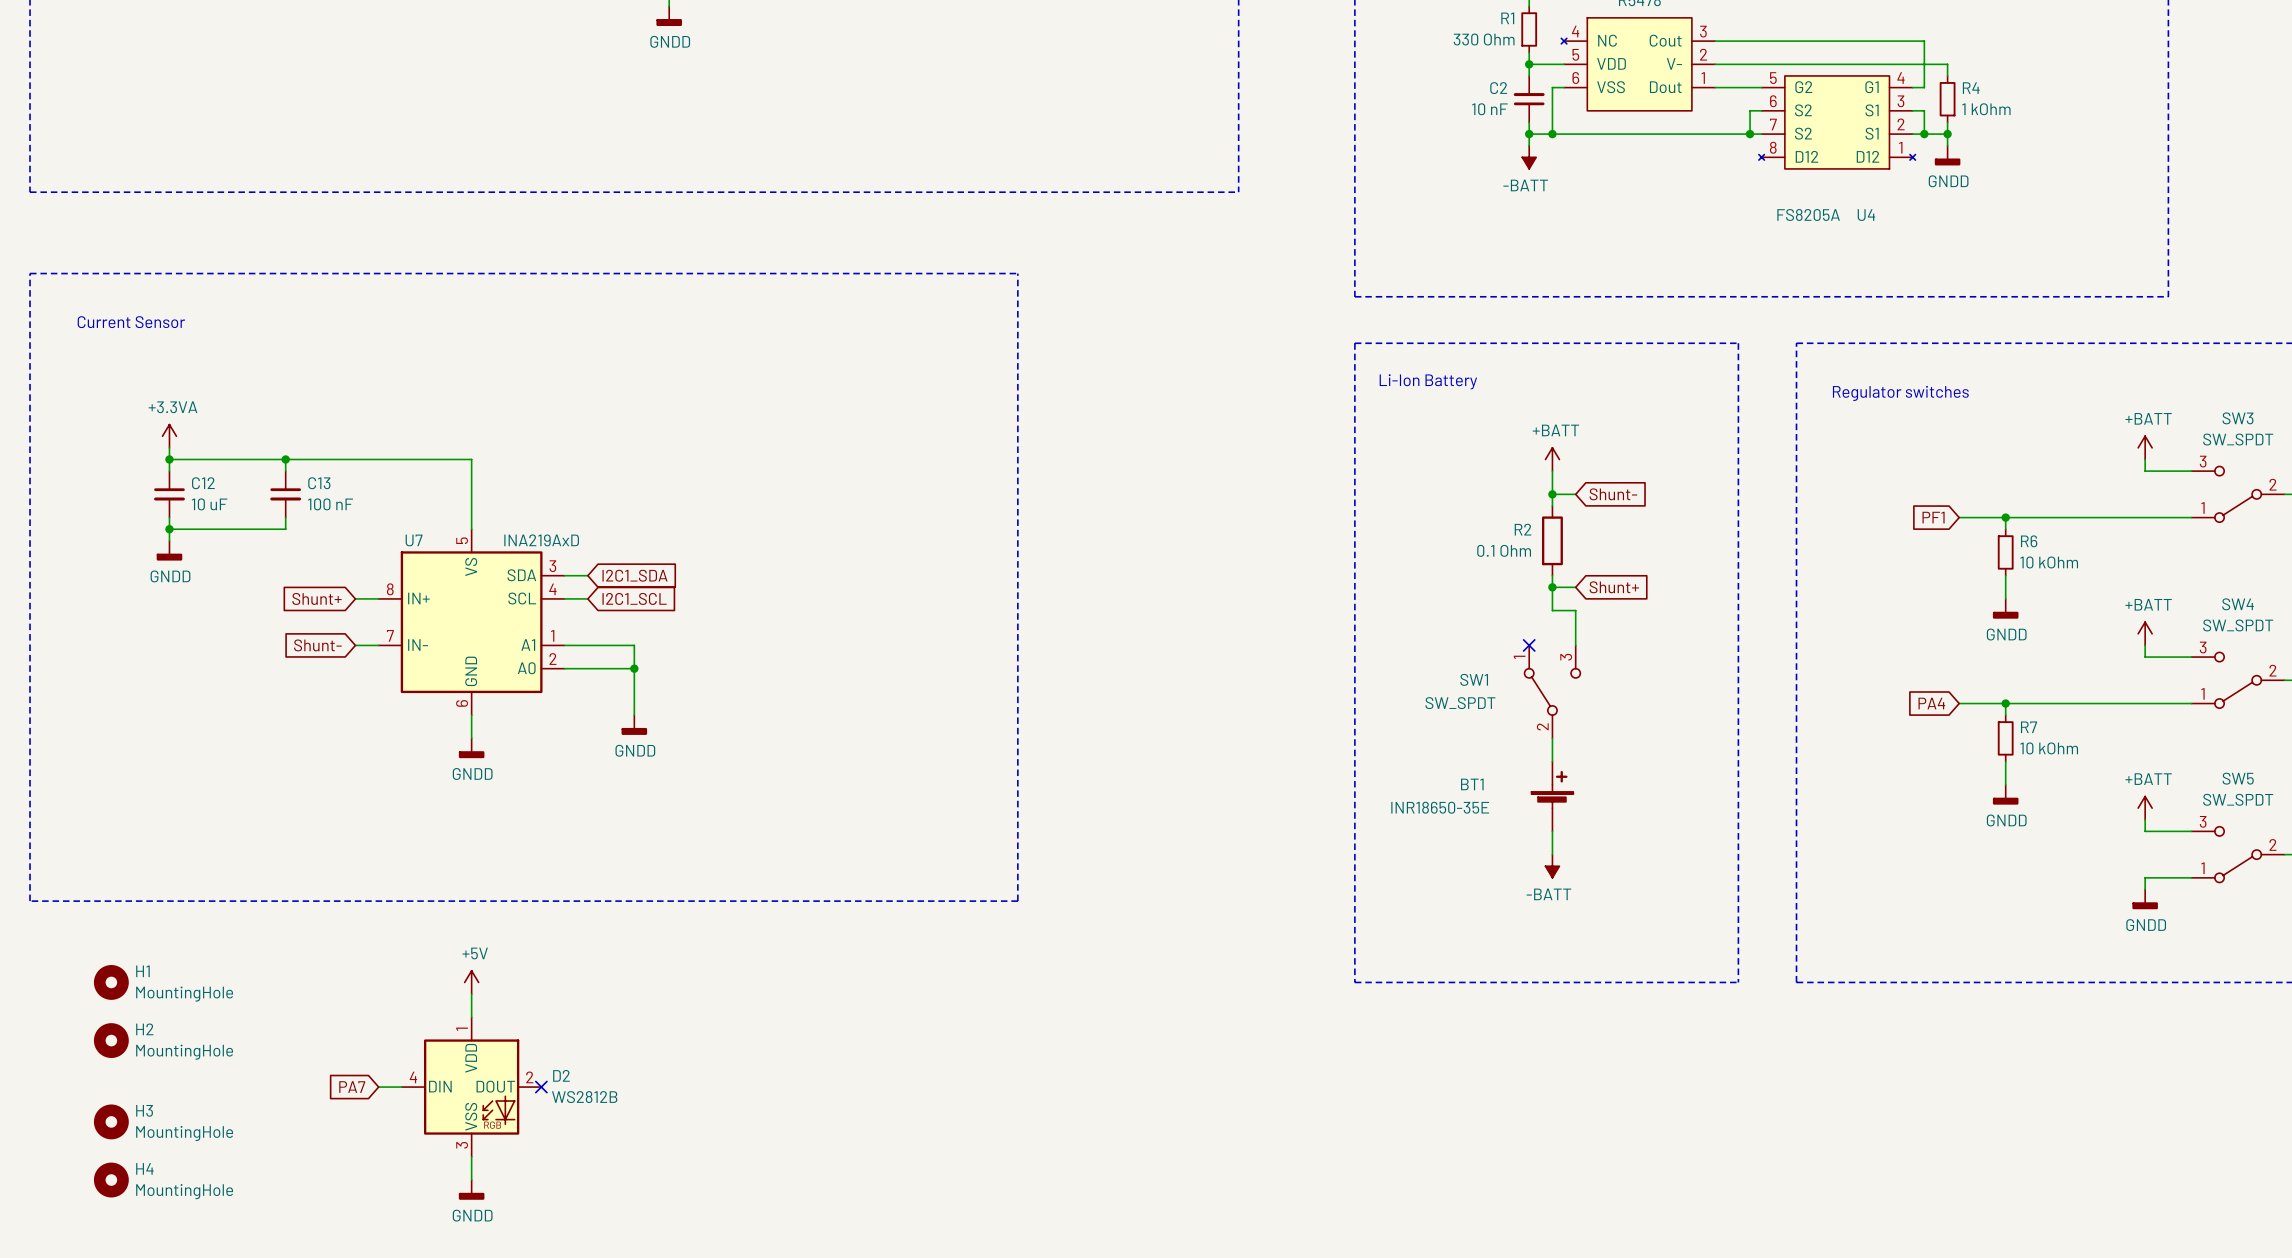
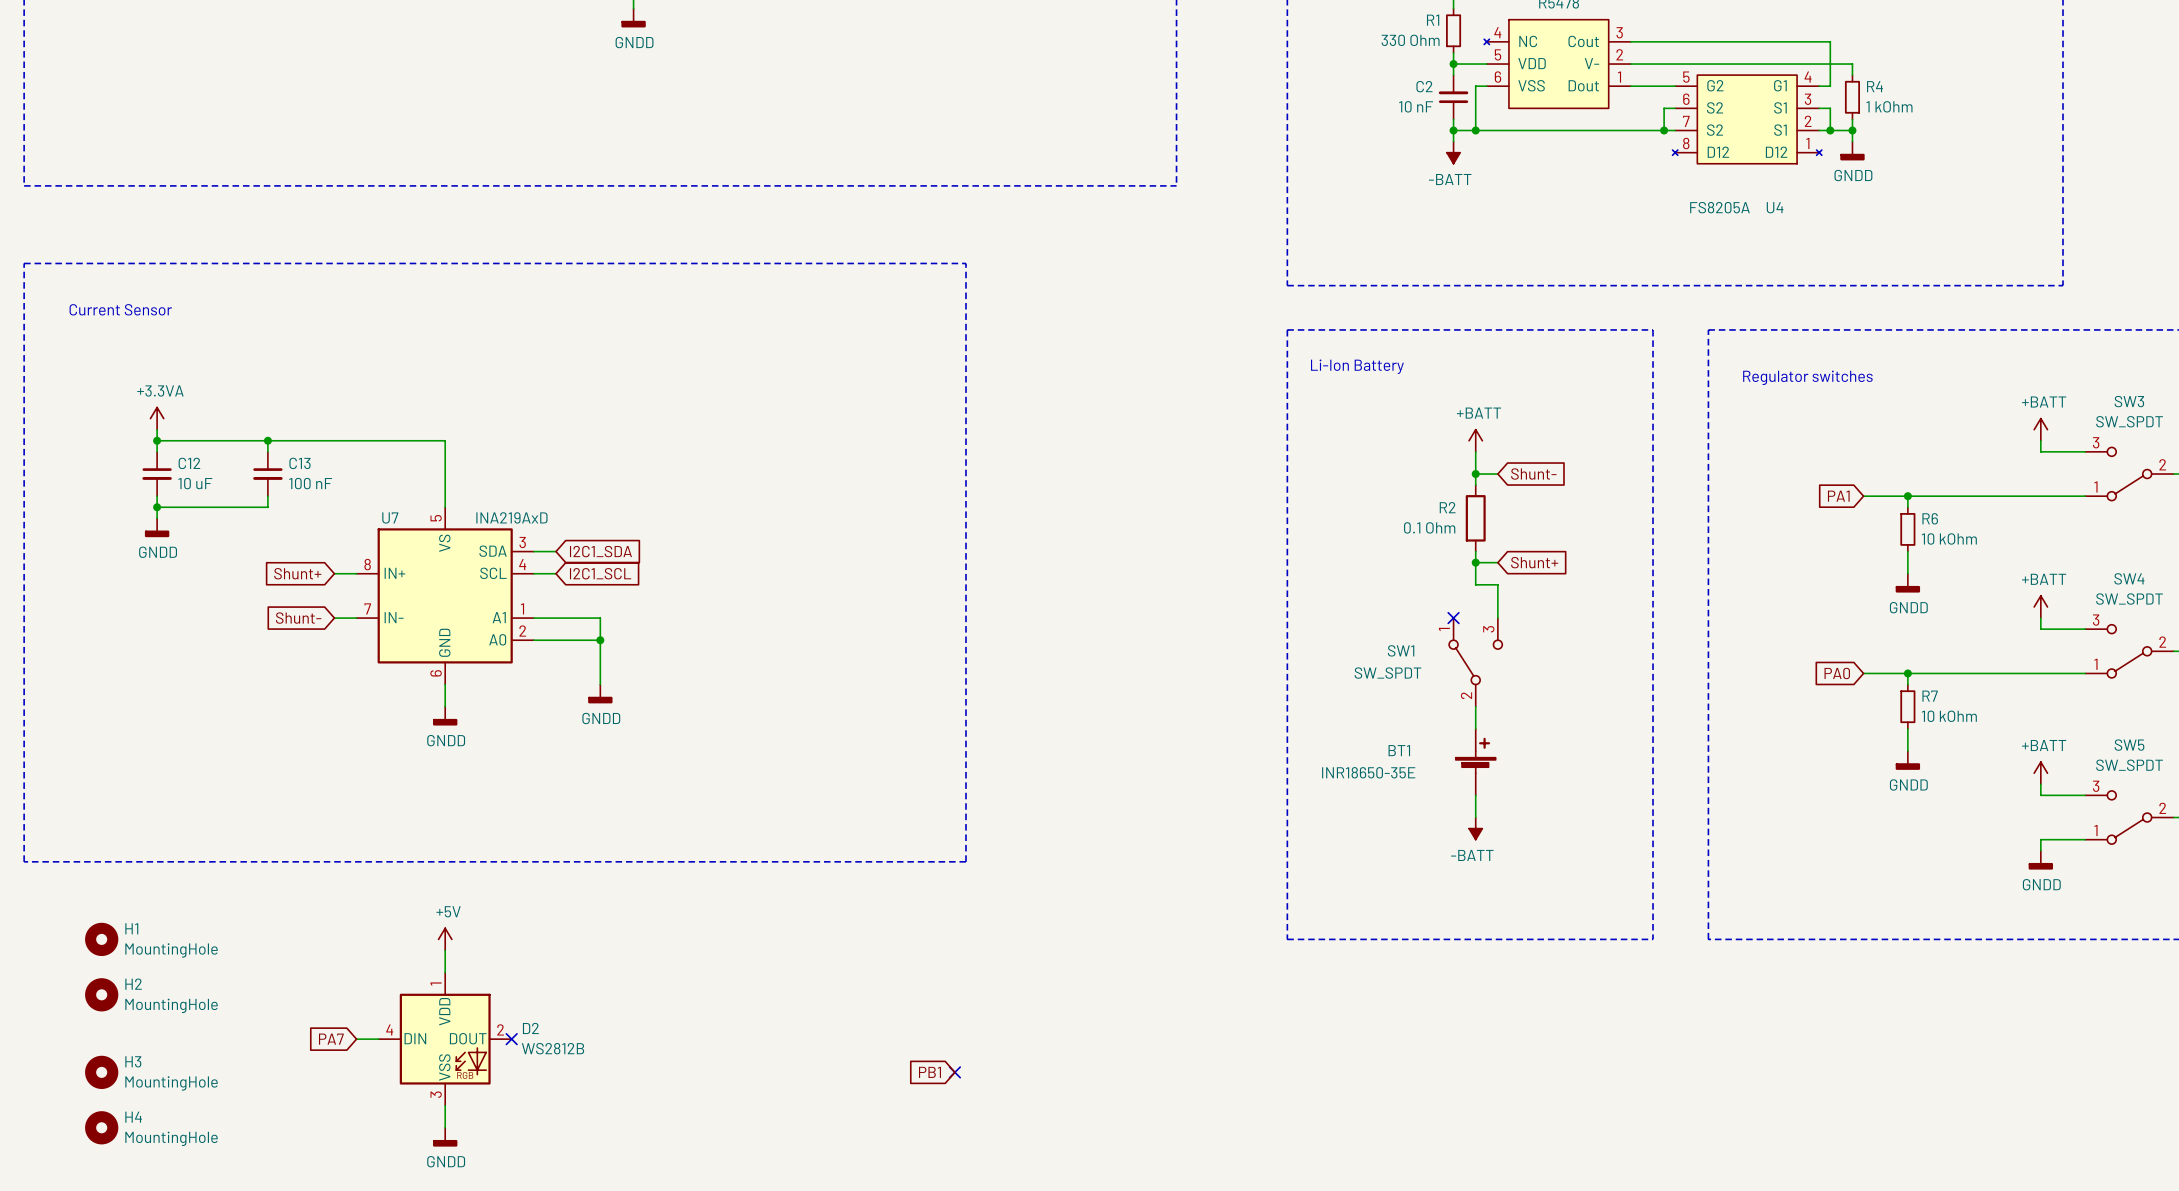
global label: PF1 (1933, 517) -> PA1 (1838, 496)
global label: PA4 (1931, 703) -> PA0 (1837, 673)
global label: none -> PB1 (929, 1072)
no-connect mark: none -> (954, 1072)

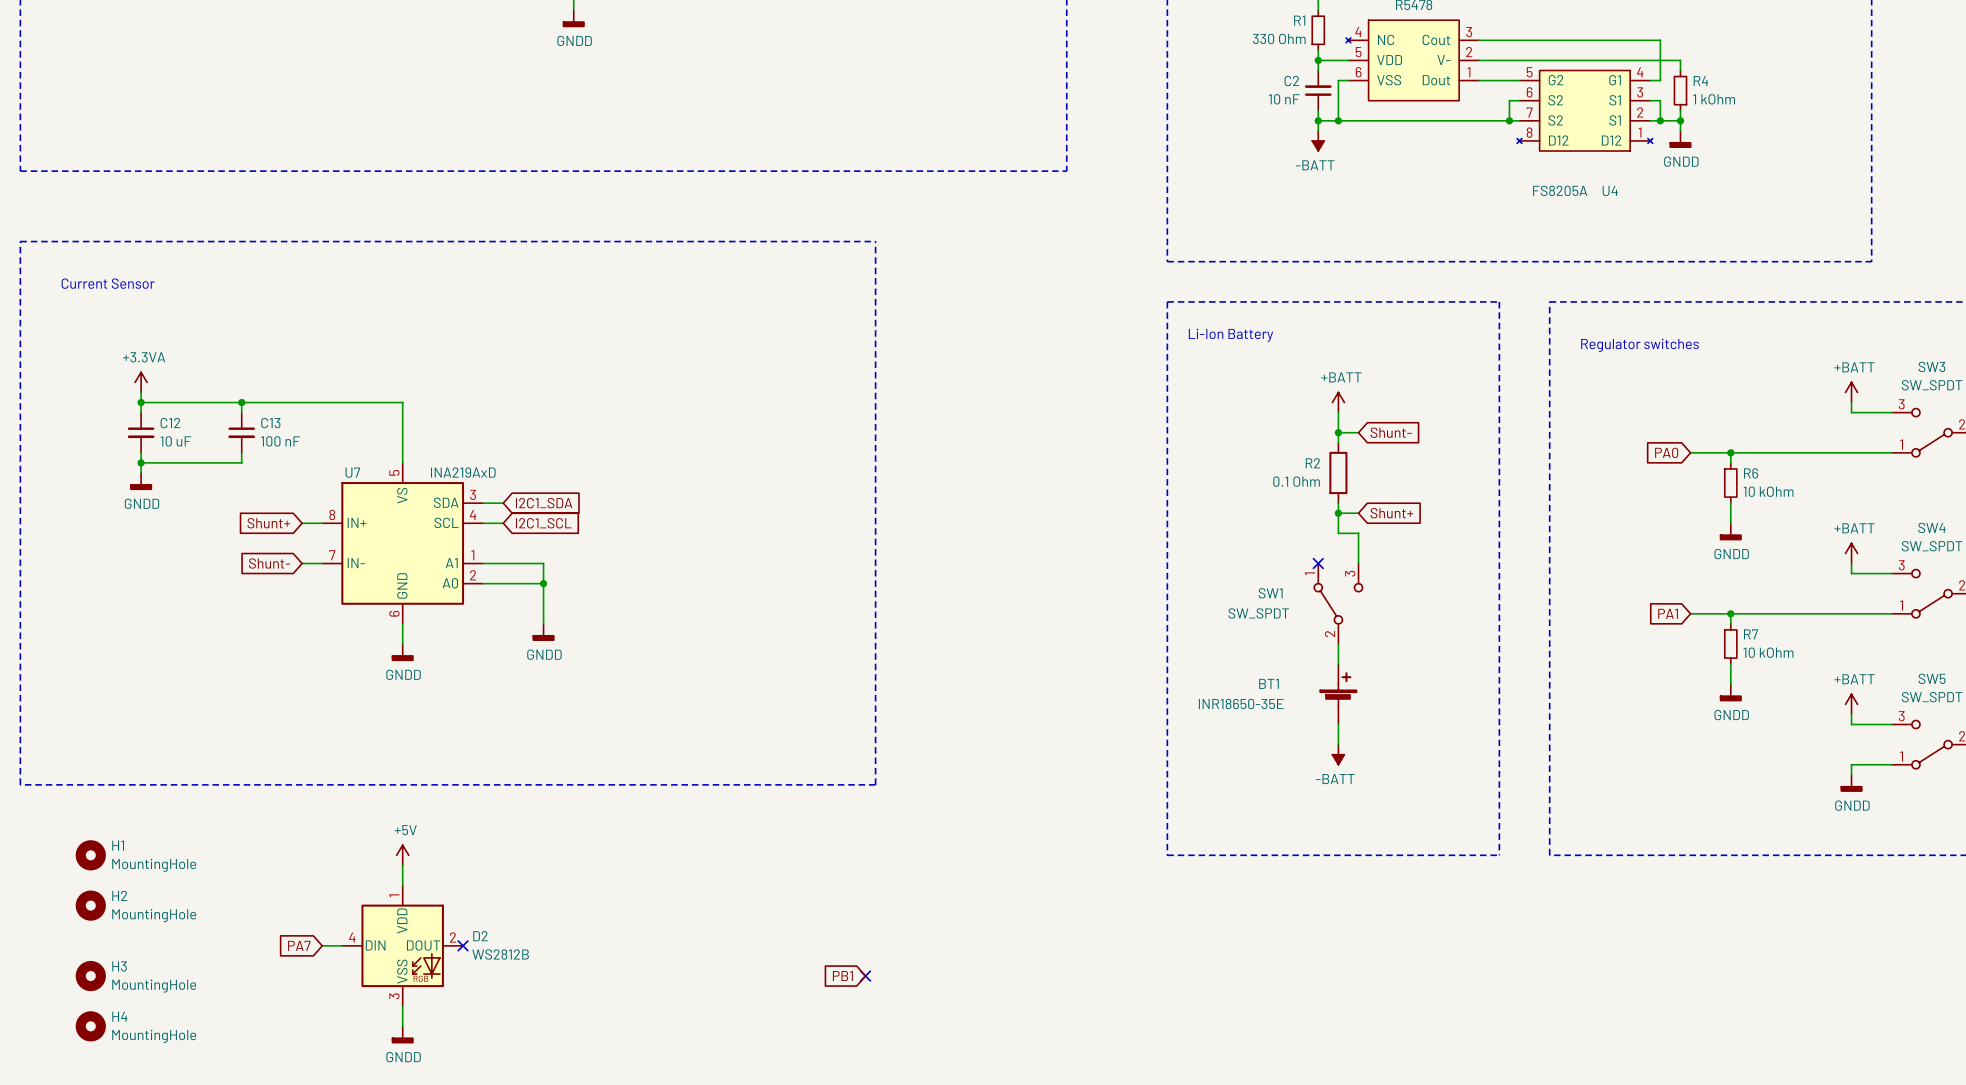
global label: PA1 (1838, 496) -> PA0 (1666, 452)
global label: PA0 (1837, 673) -> PA1 (1668, 613)

